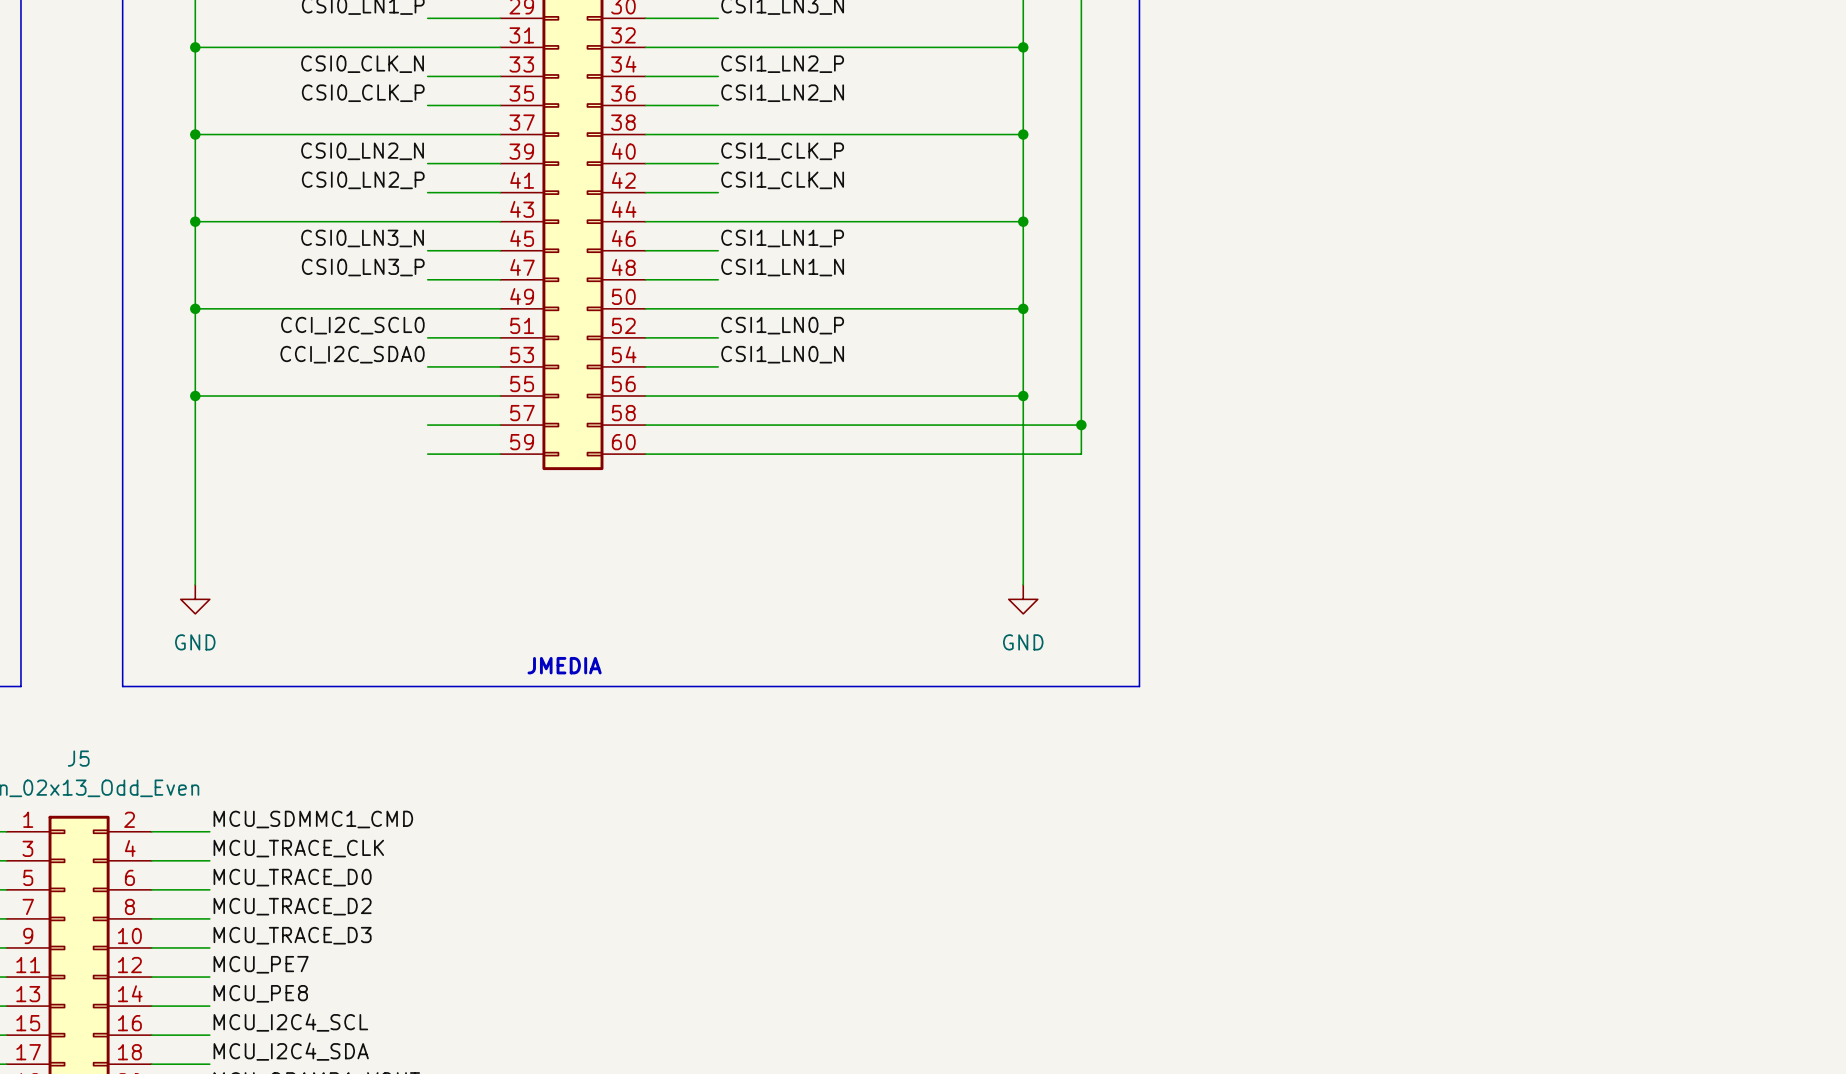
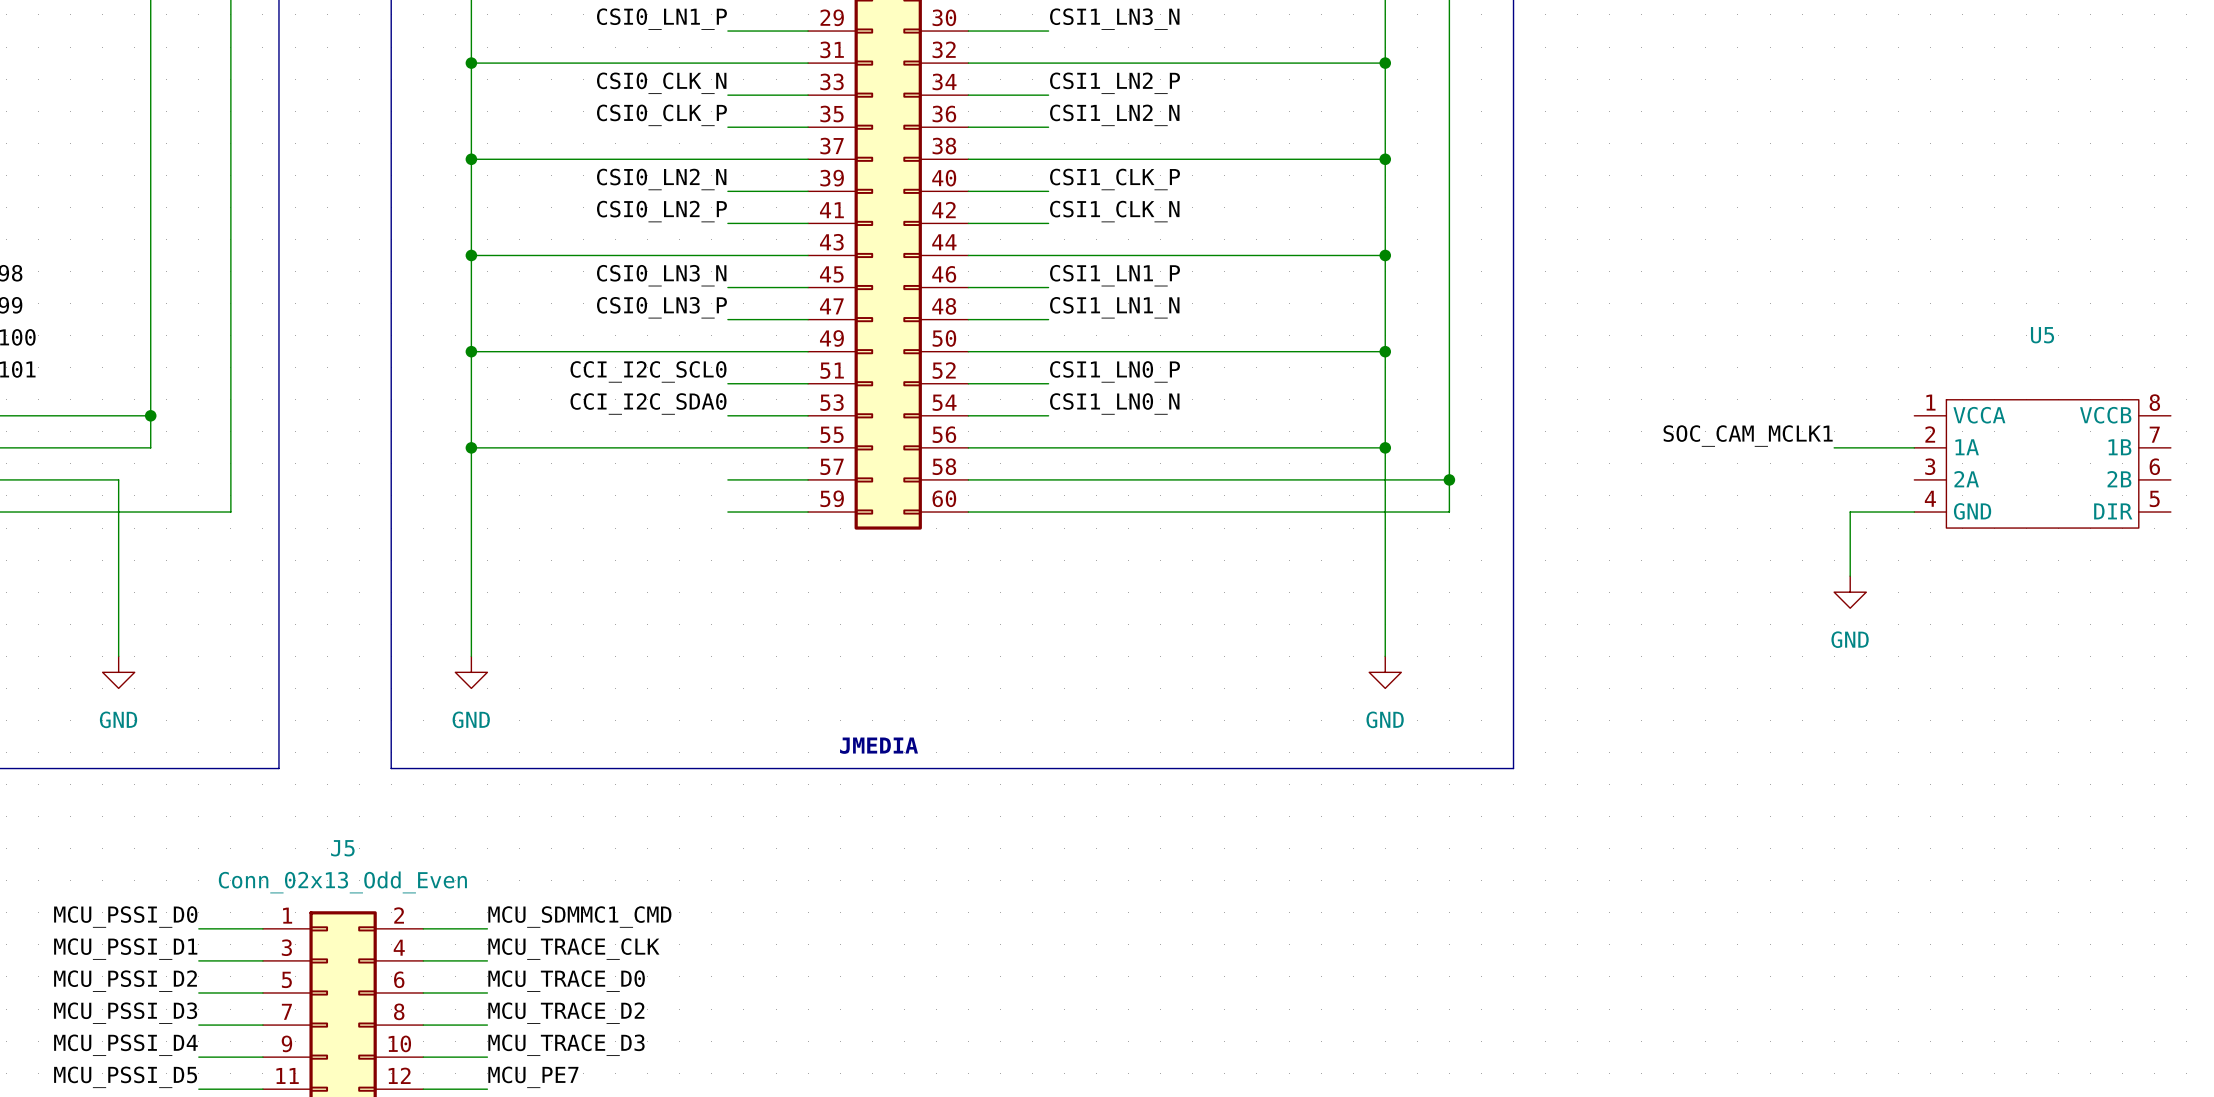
label: none -> SOC_CAM_MCLK1 (1748, 436)
wire: none -> (1834, 447) (1914, 447)
U5: none -> (2042, 463)
wire: none -> (1914, 512) (1850, 512) (1850, 576)
power symbol: none -> GND (1850, 592)

